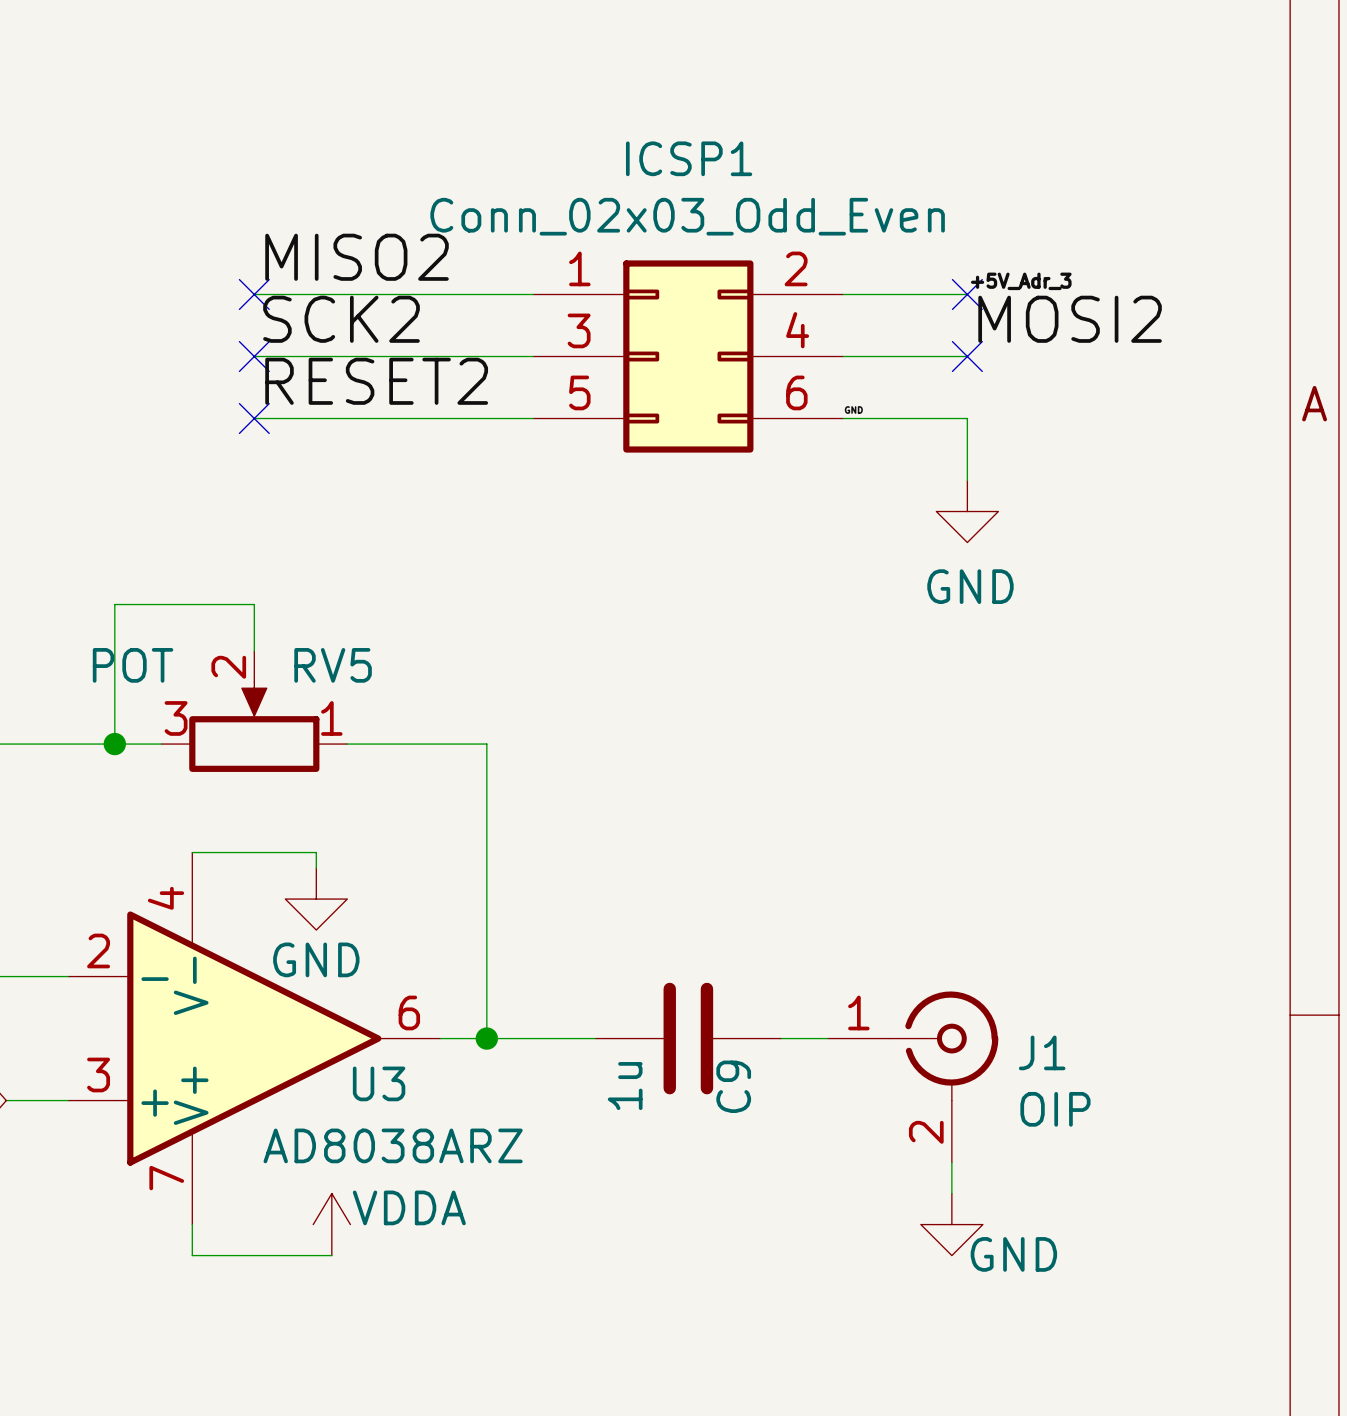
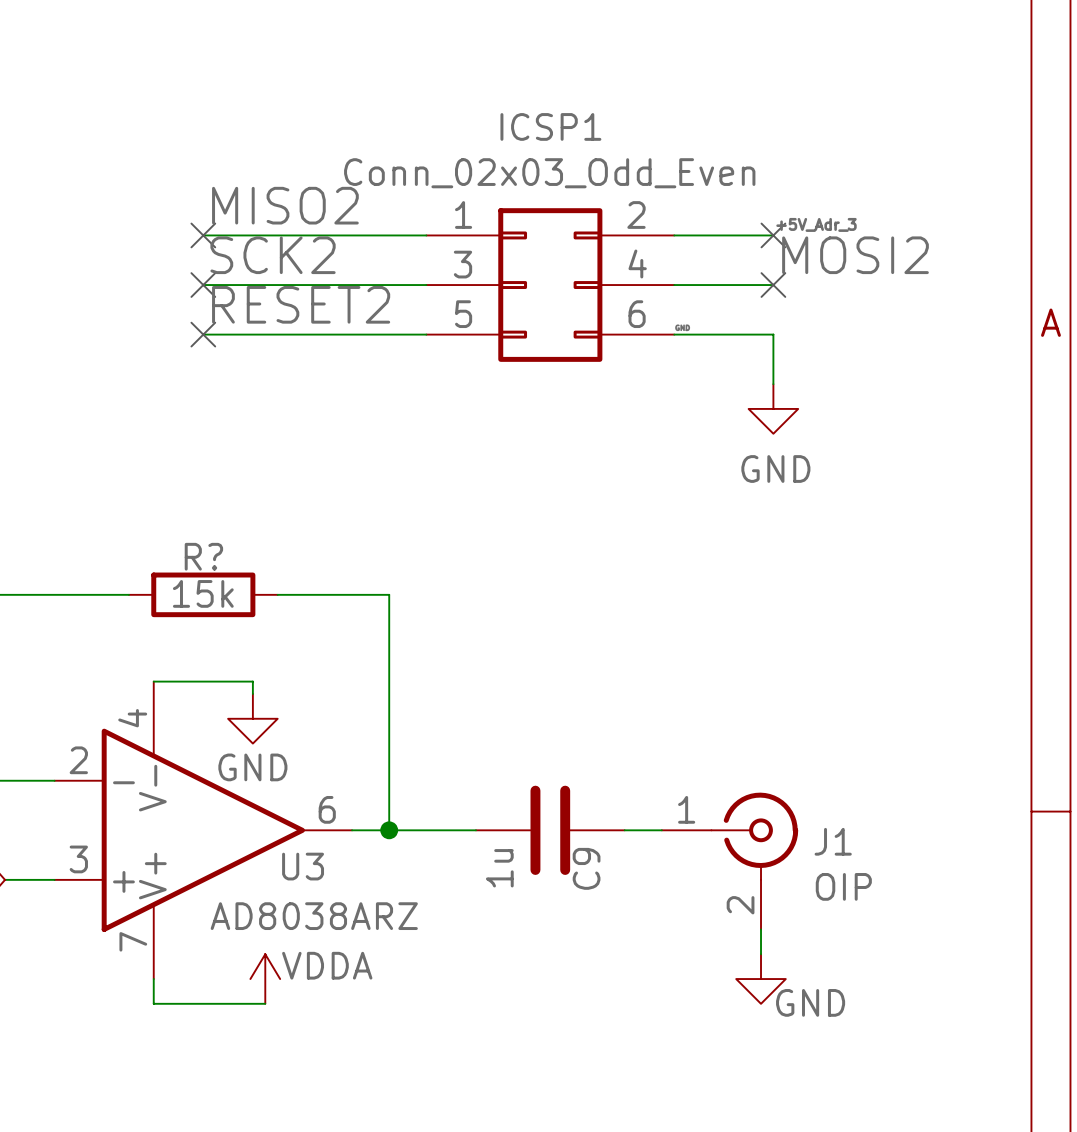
wire: (254, 651) (254, 604) (114, 604) (114, 744) -> none
RV5: POT (254, 711) -> none
junction: (114, 744) -> none
R?: none -> 15k (203, 594)

